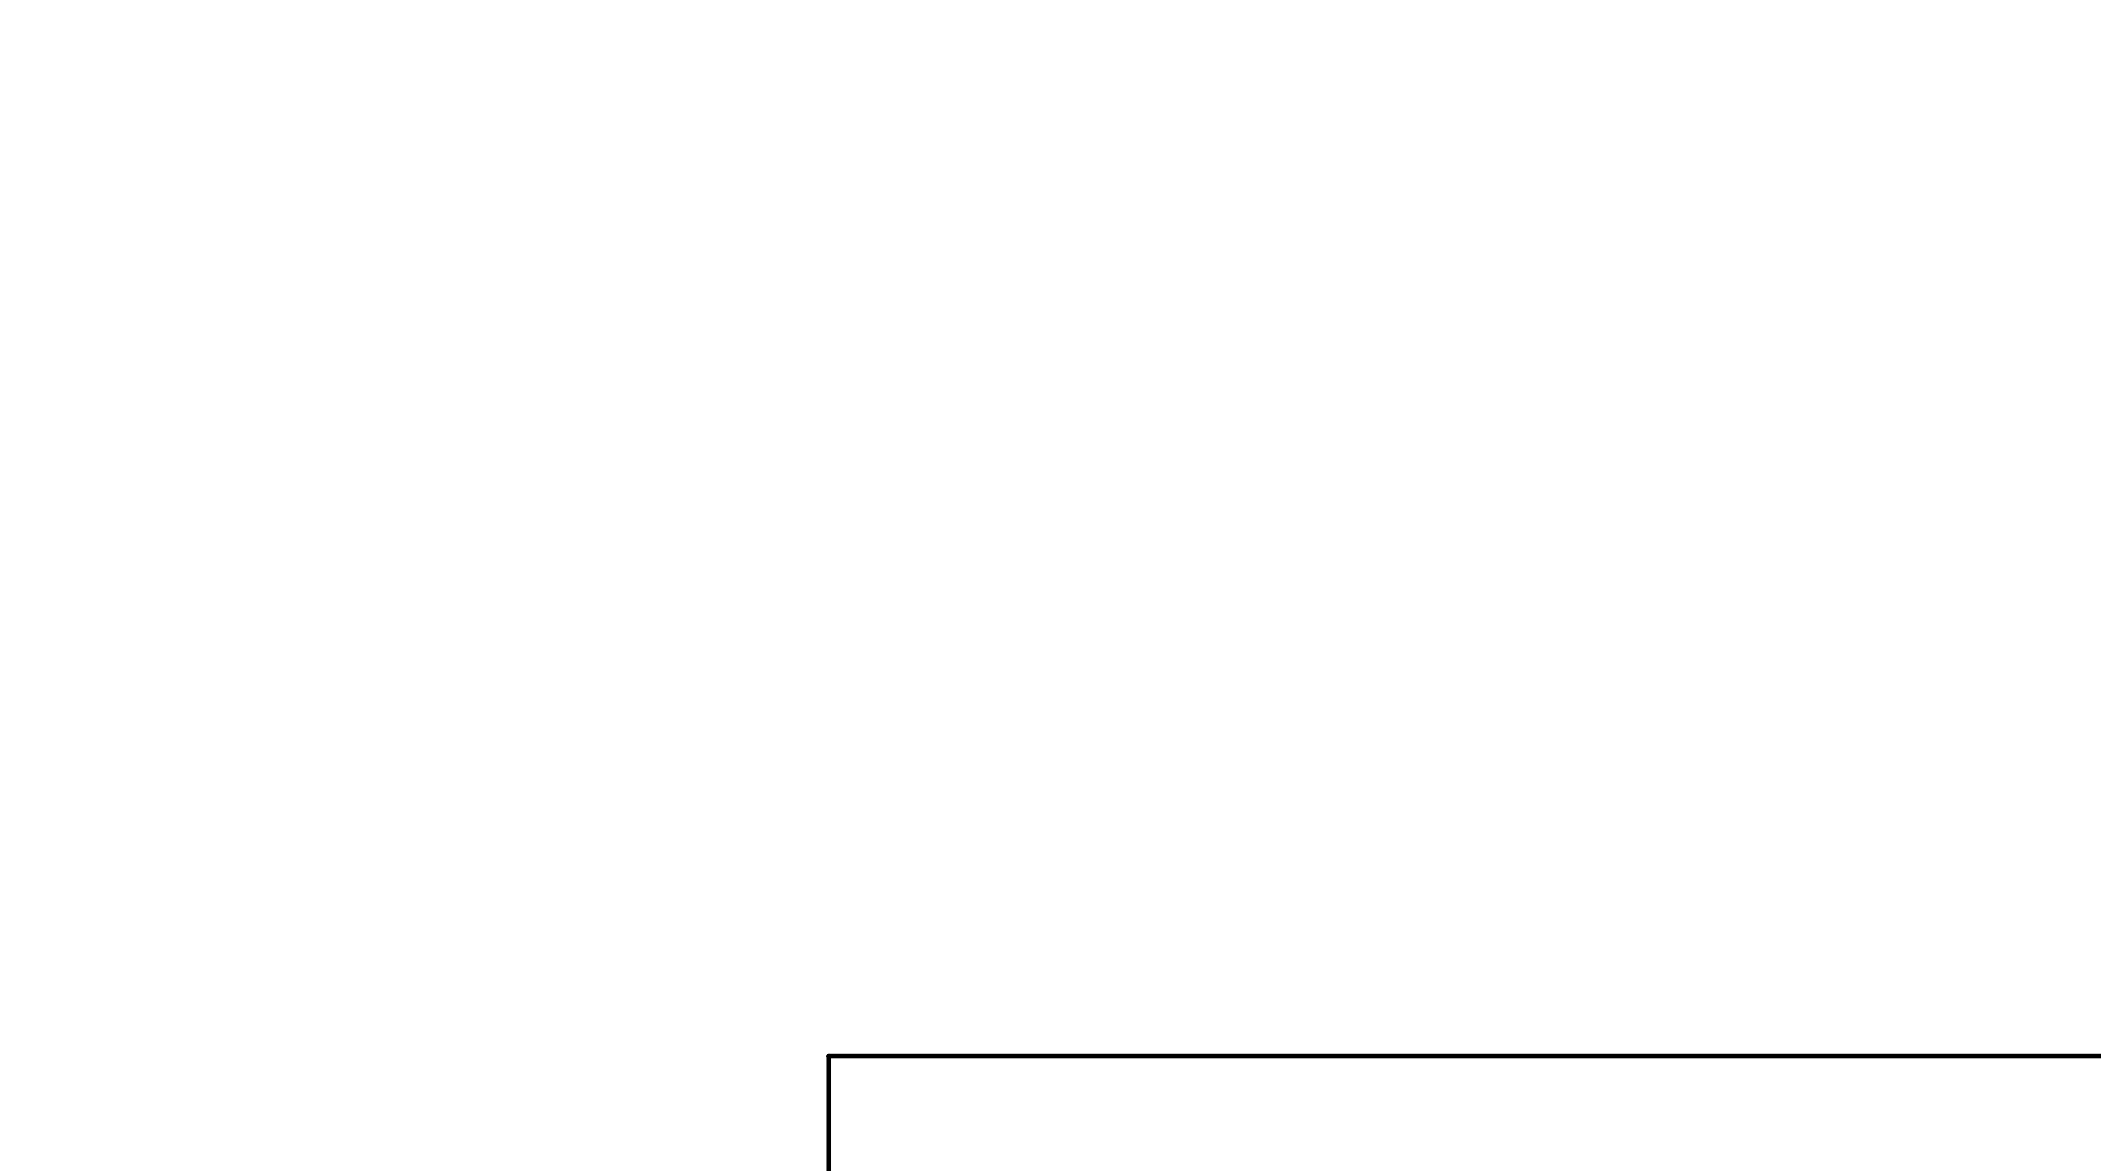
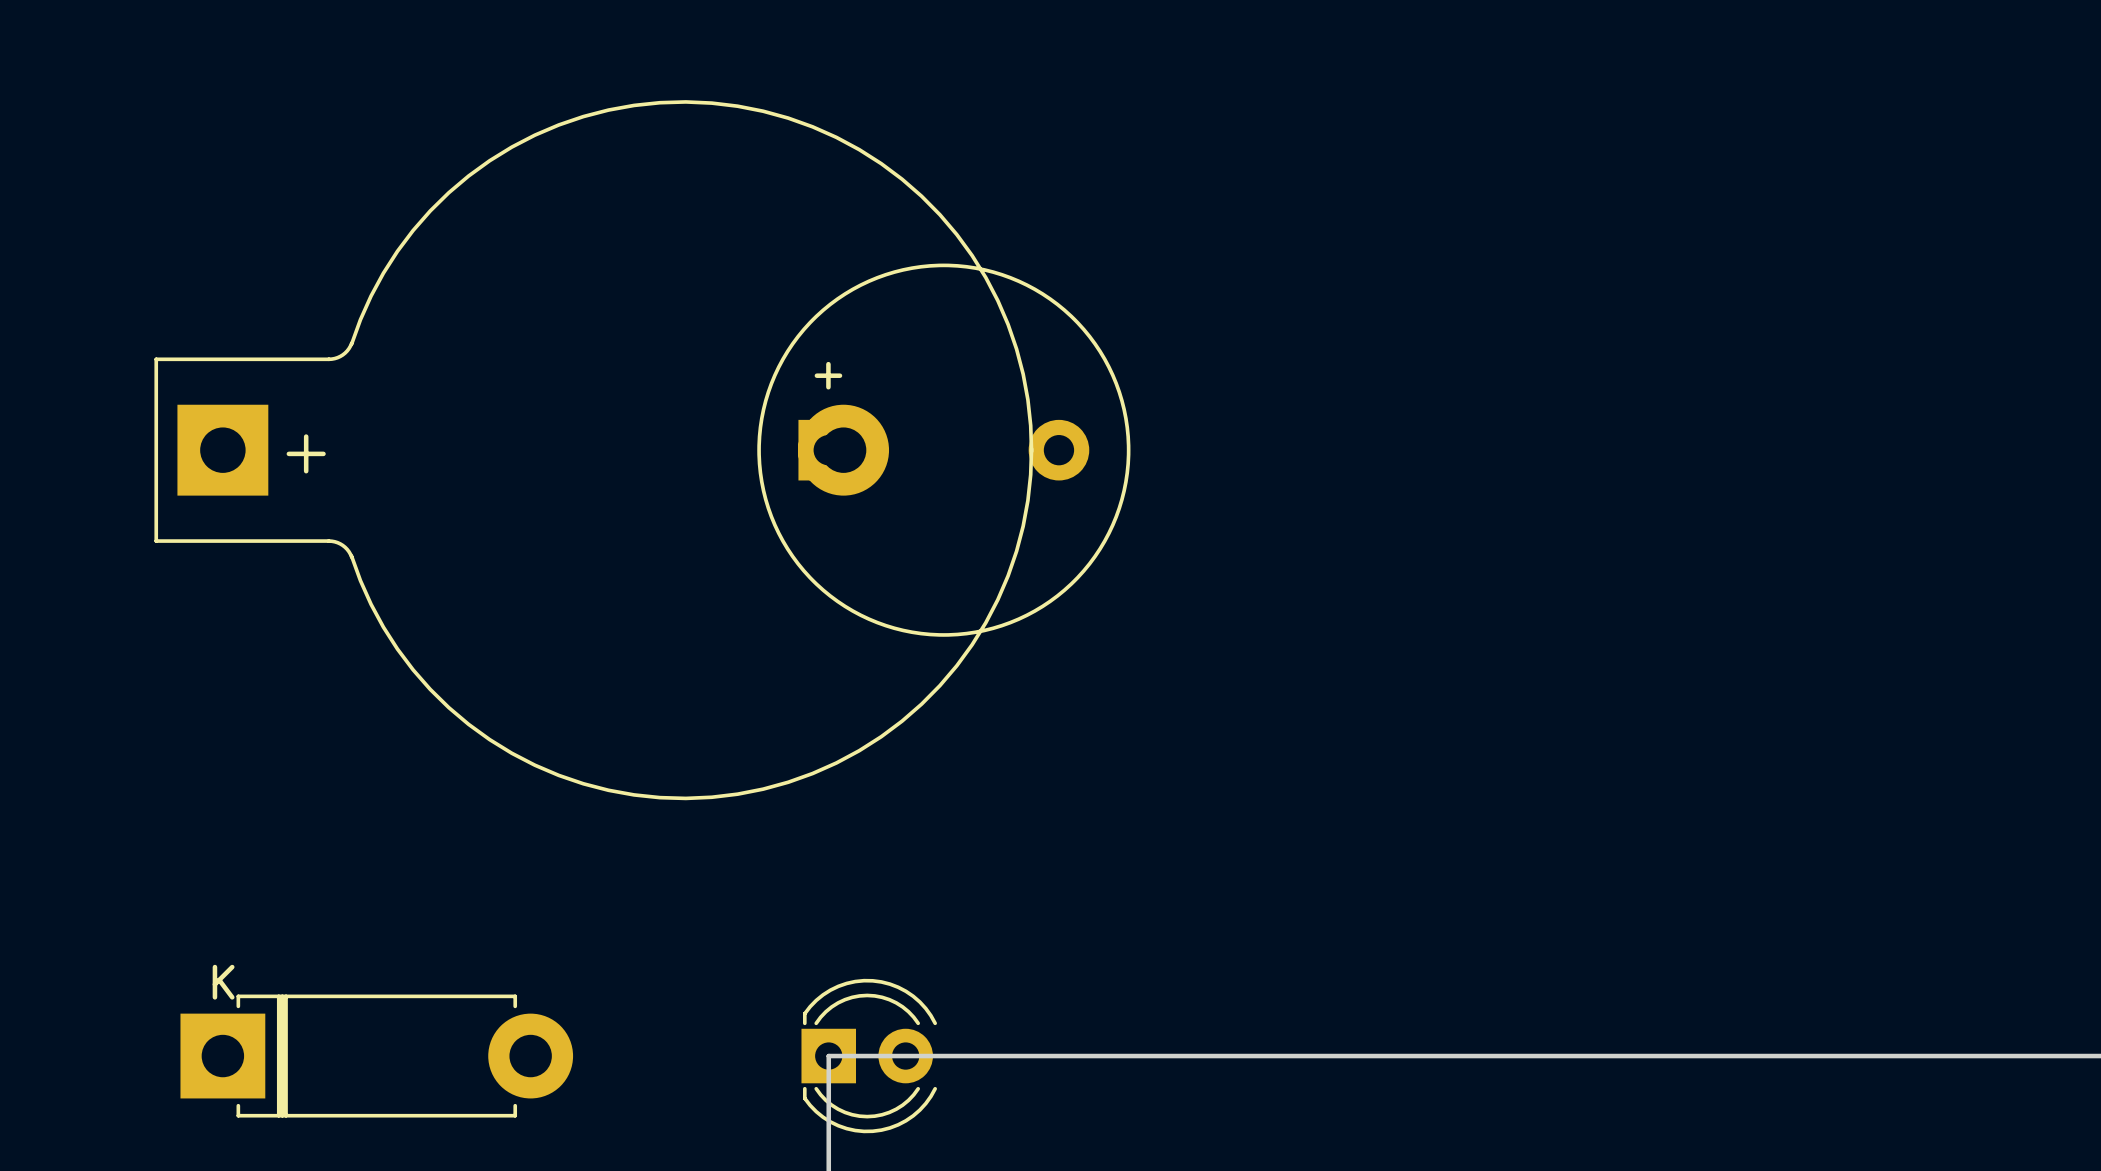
part: none -> (593, 450)
part: none -> (943, 450)
part: none -> (376, 1056)
part: none -> (869, 1056)

